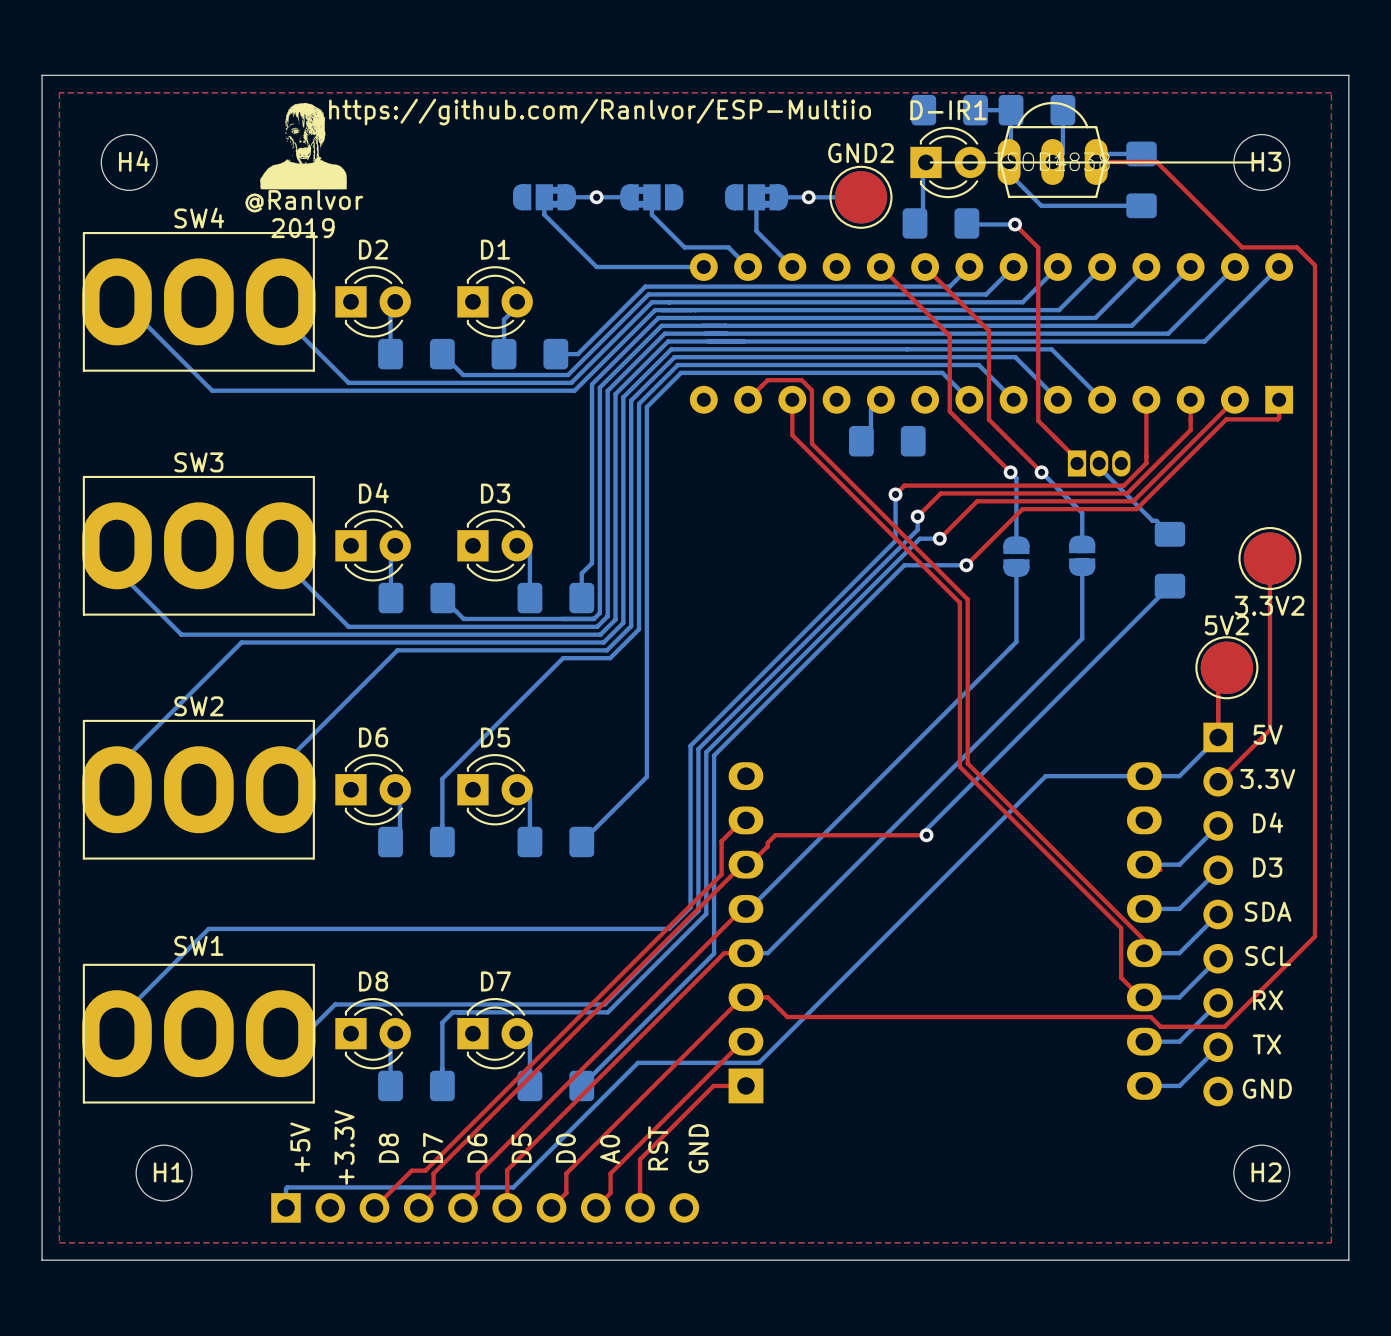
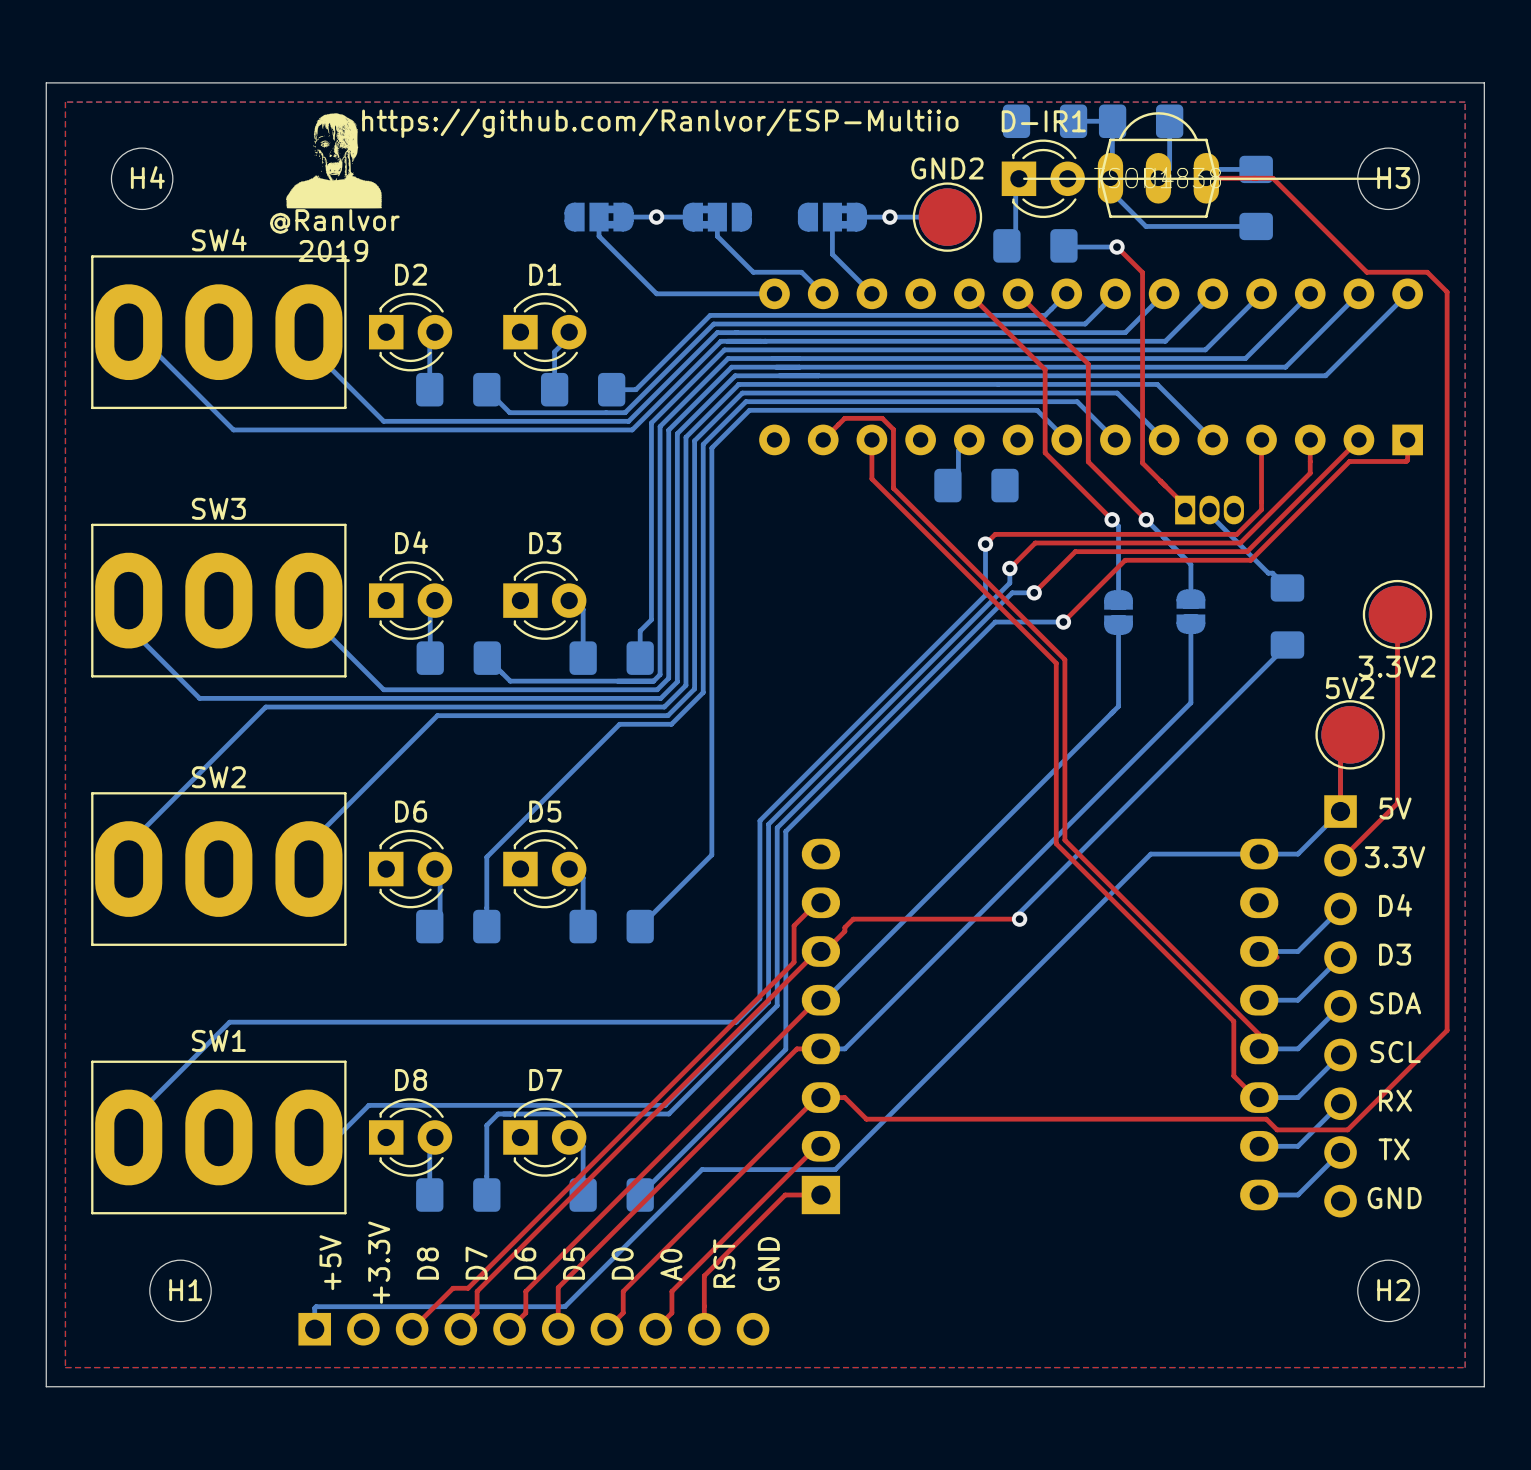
SW4 footprint: [82, 231, 316, 372] -> [91, 255, 347, 410]
SW3 footprint: [82, 475, 316, 616] -> [91, 523, 347, 678]
SW2 footprint: [82, 719, 316, 860] -> [91, 792, 347, 946]
SW1 footprint: [82, 963, 316, 1104] -> [91, 1060, 347, 1215]

